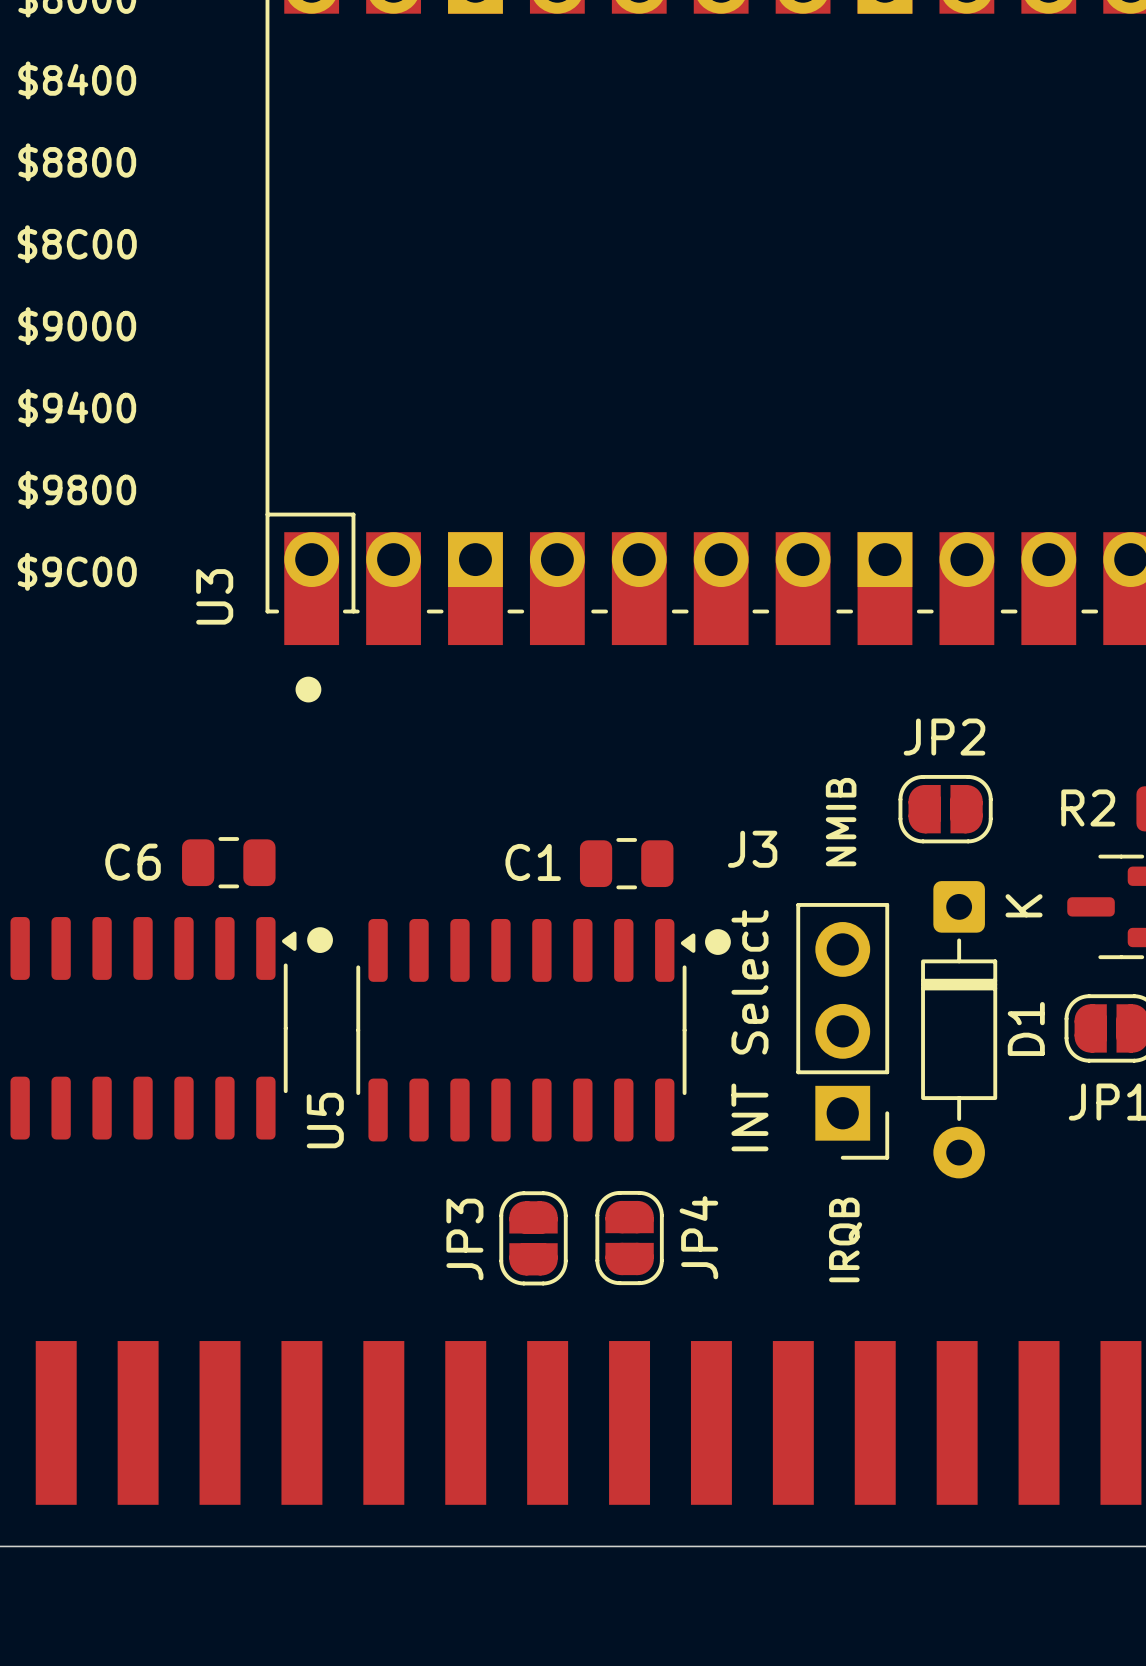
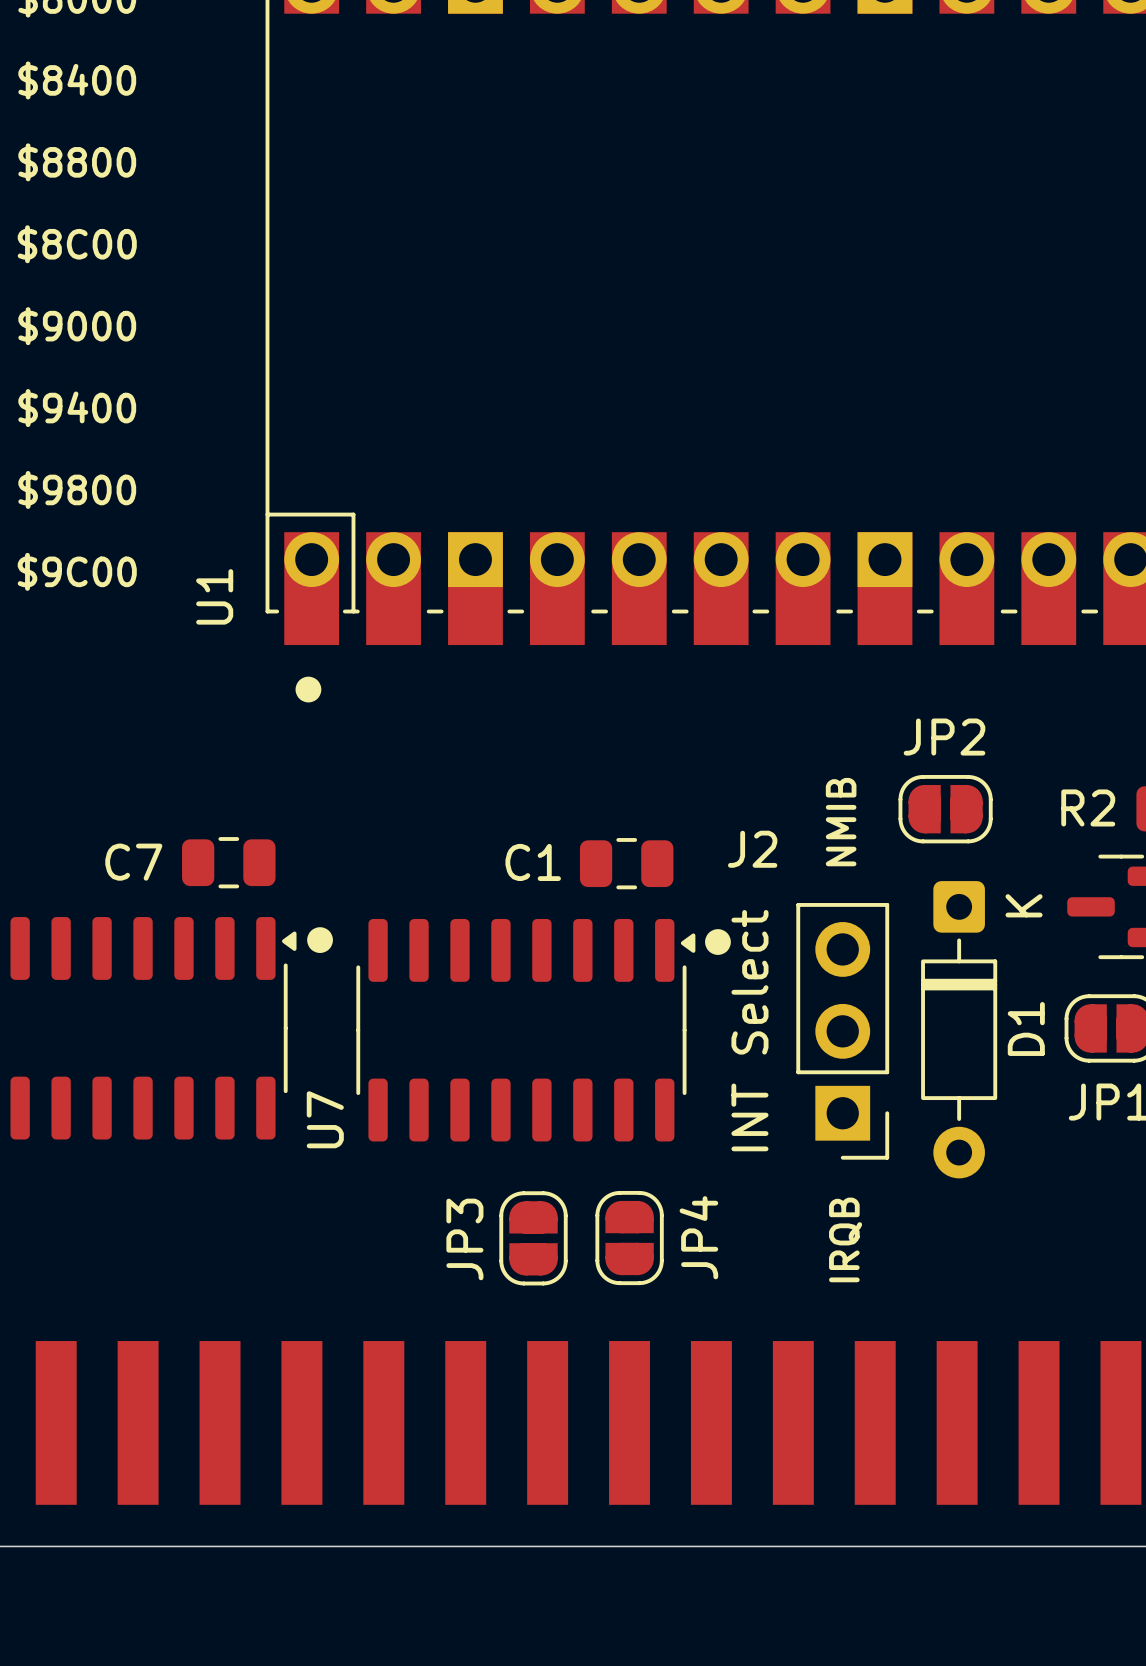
U3 name: U3 (214, 596) -> U1 (214, 596)
J3 name: J3 (752, 849) -> J2 (752, 849)
C6 name: C6 (133, 862) -> C7 (133, 862)
U5 name: U5 (325, 1120) -> U7 (325, 1119)

